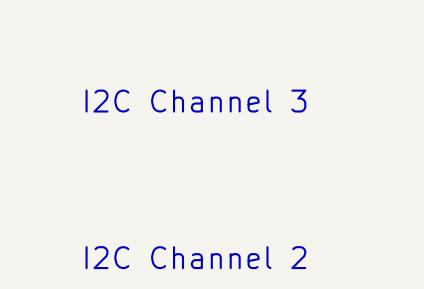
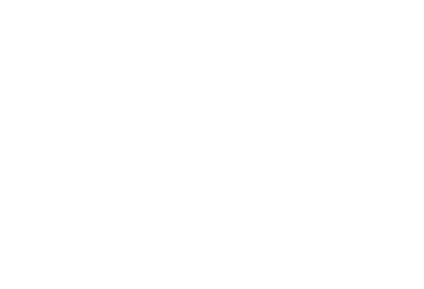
text: I2C Channel 3 (195, 101) -> none
text: I2C Channel 2 (195, 257) -> none

